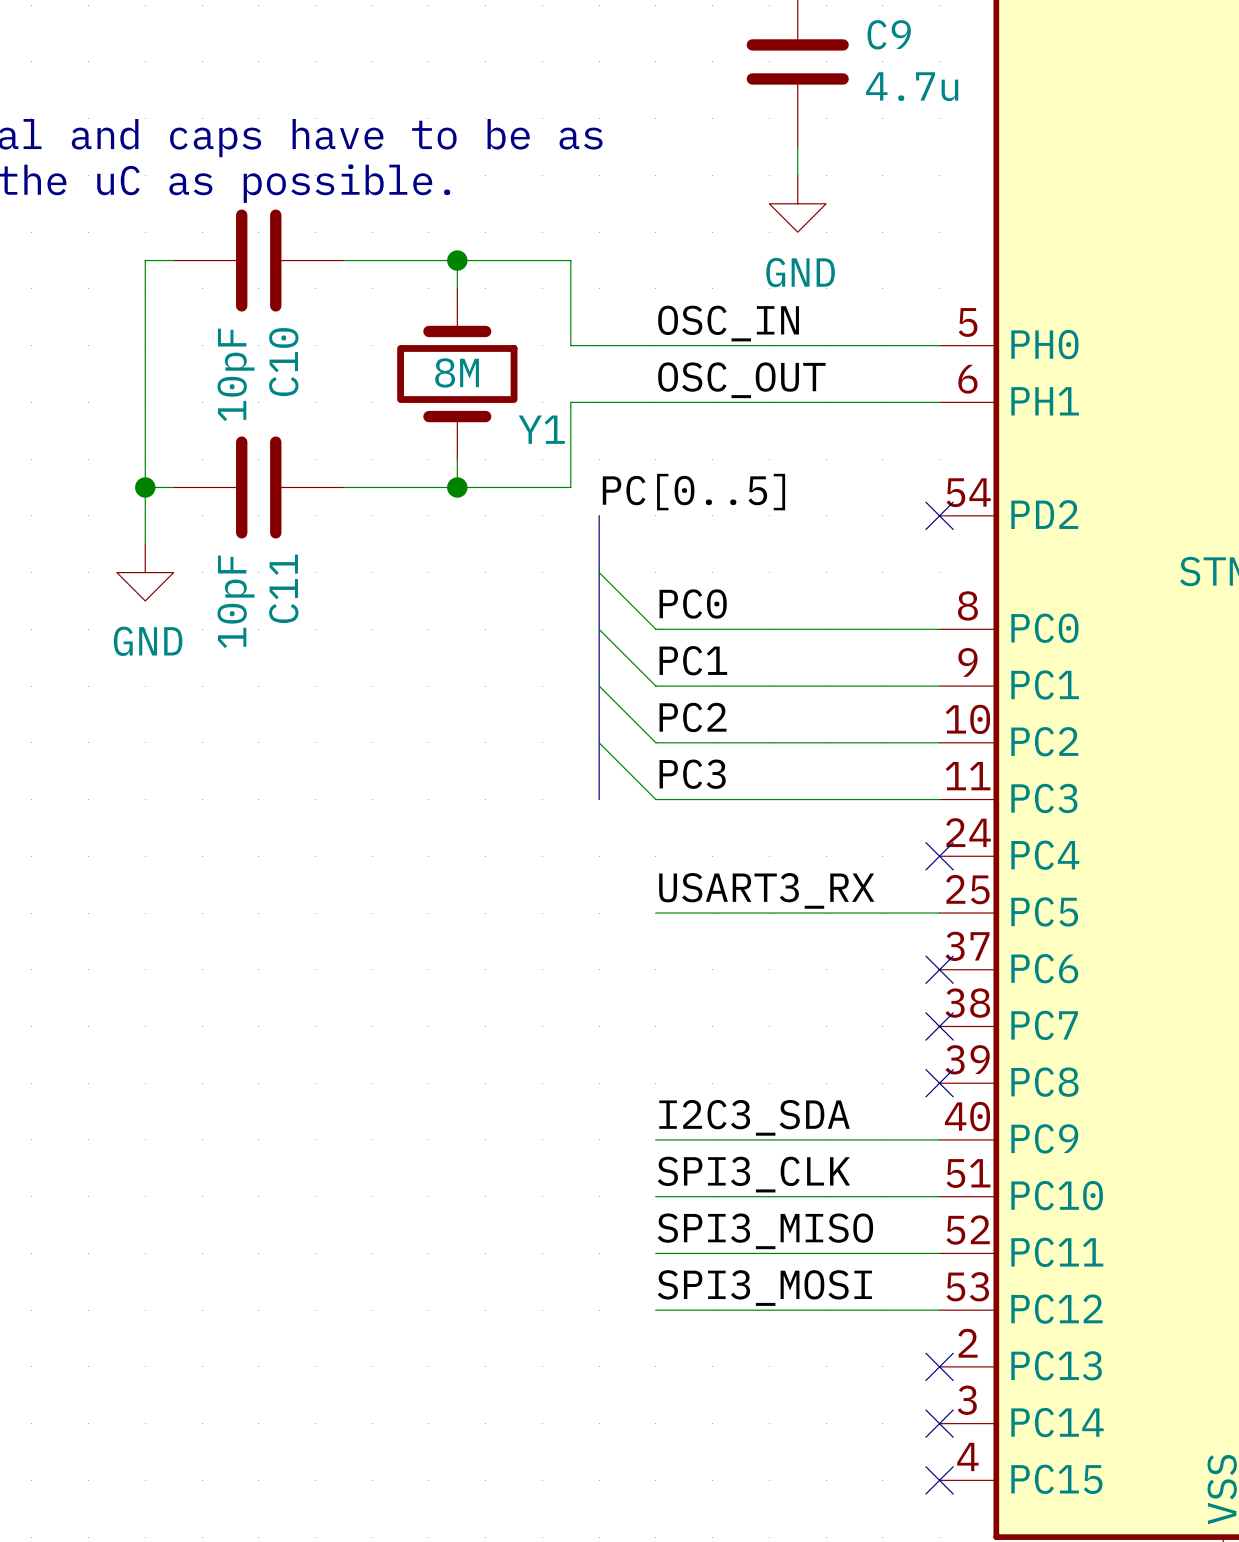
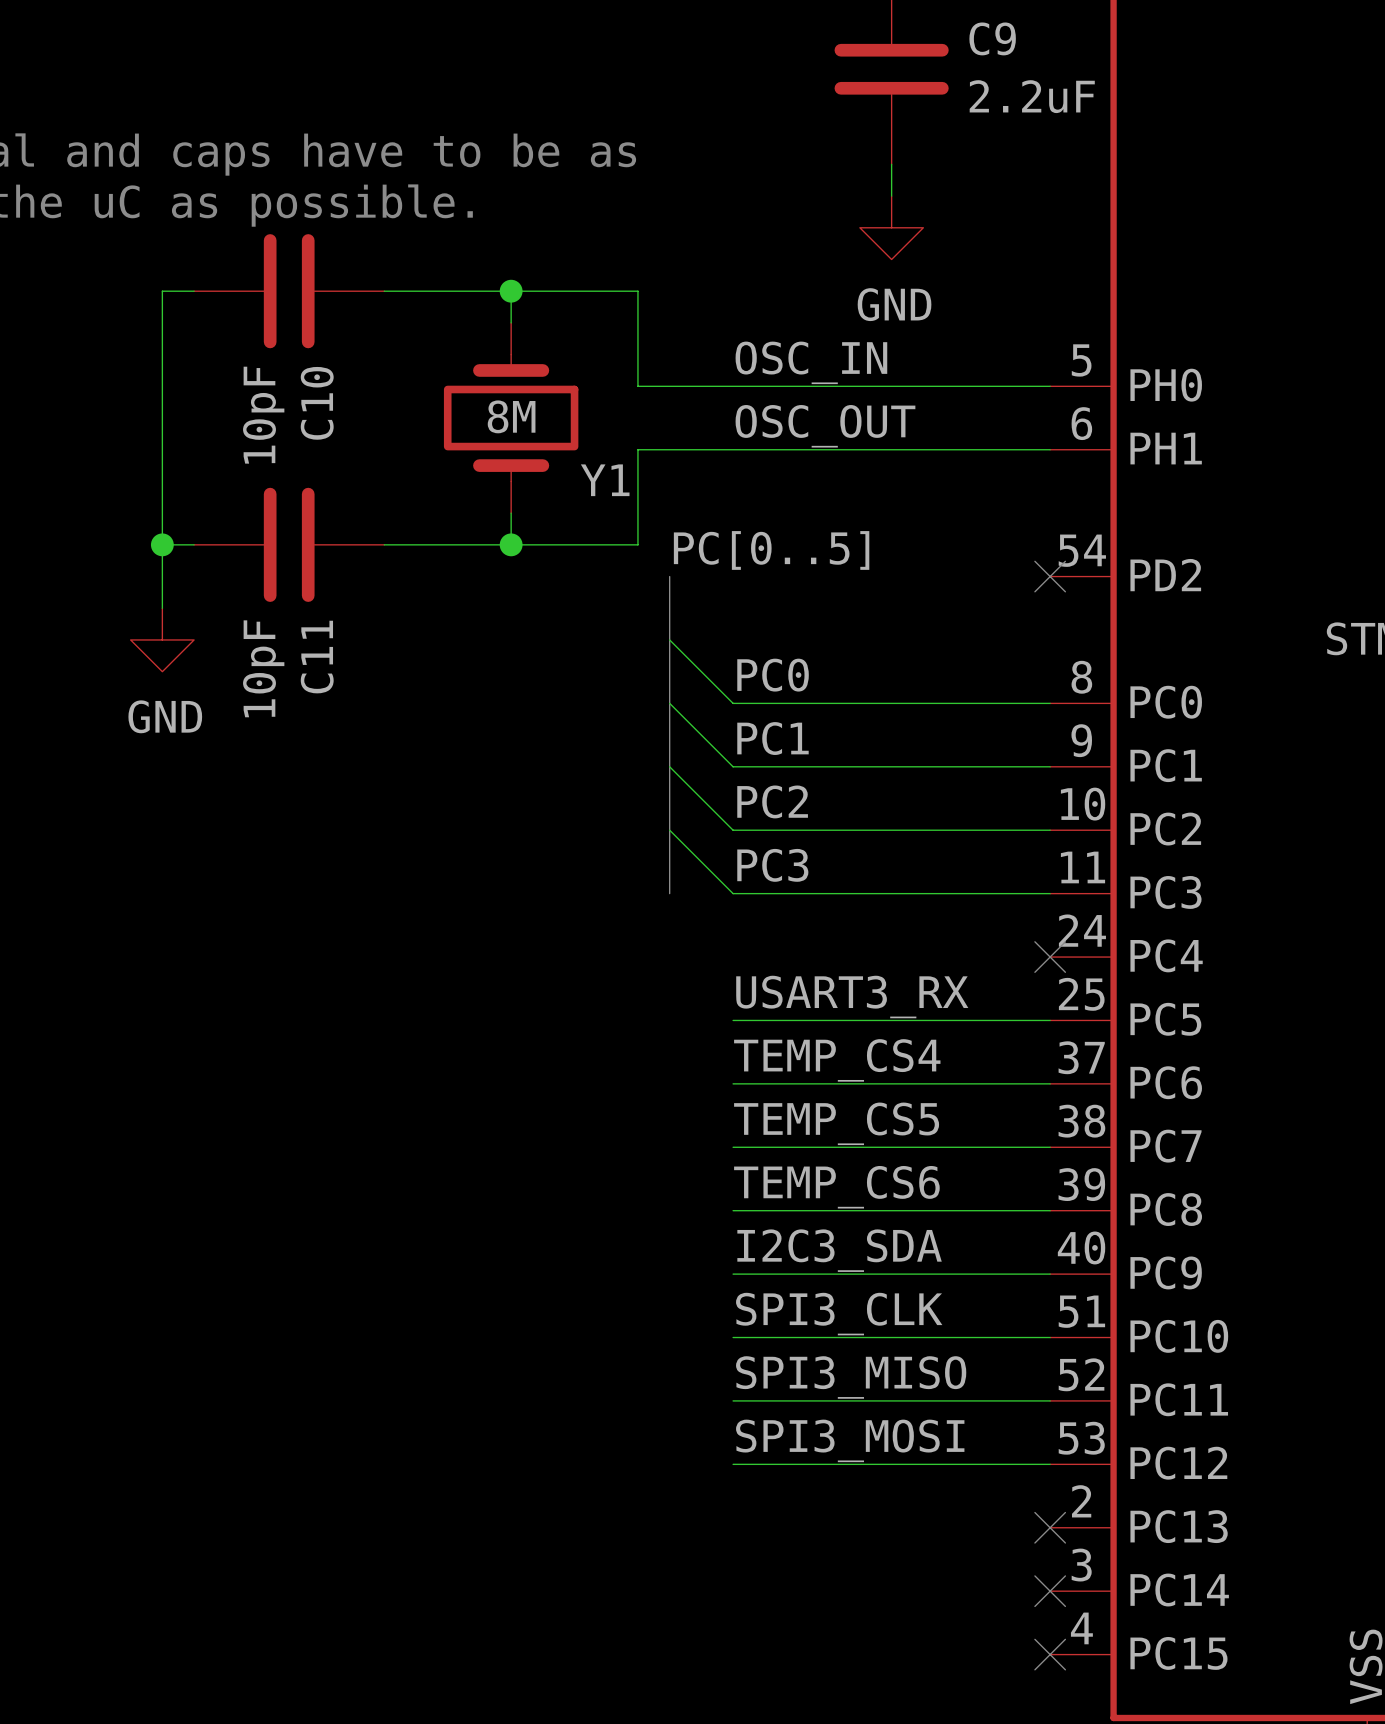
C9 value: 4.7u (912, 86) -> 2.2uF (1032, 96)
label: none -> TEMP_CS4 (837, 1060)
wire: none -> (733, 1083) (1050, 1083)
no-connect mark: (939, 969) -> none
label: none -> TEMP_CS5 (836, 1123)
wire: none -> (733, 1147) (1050, 1147)
no-connect mark: (939, 1026) -> none
label: none -> TEMP_CS6 (836, 1187)
wire: none -> (733, 1210) (1050, 1210)
no-connect mark: (939, 1083) -> none

